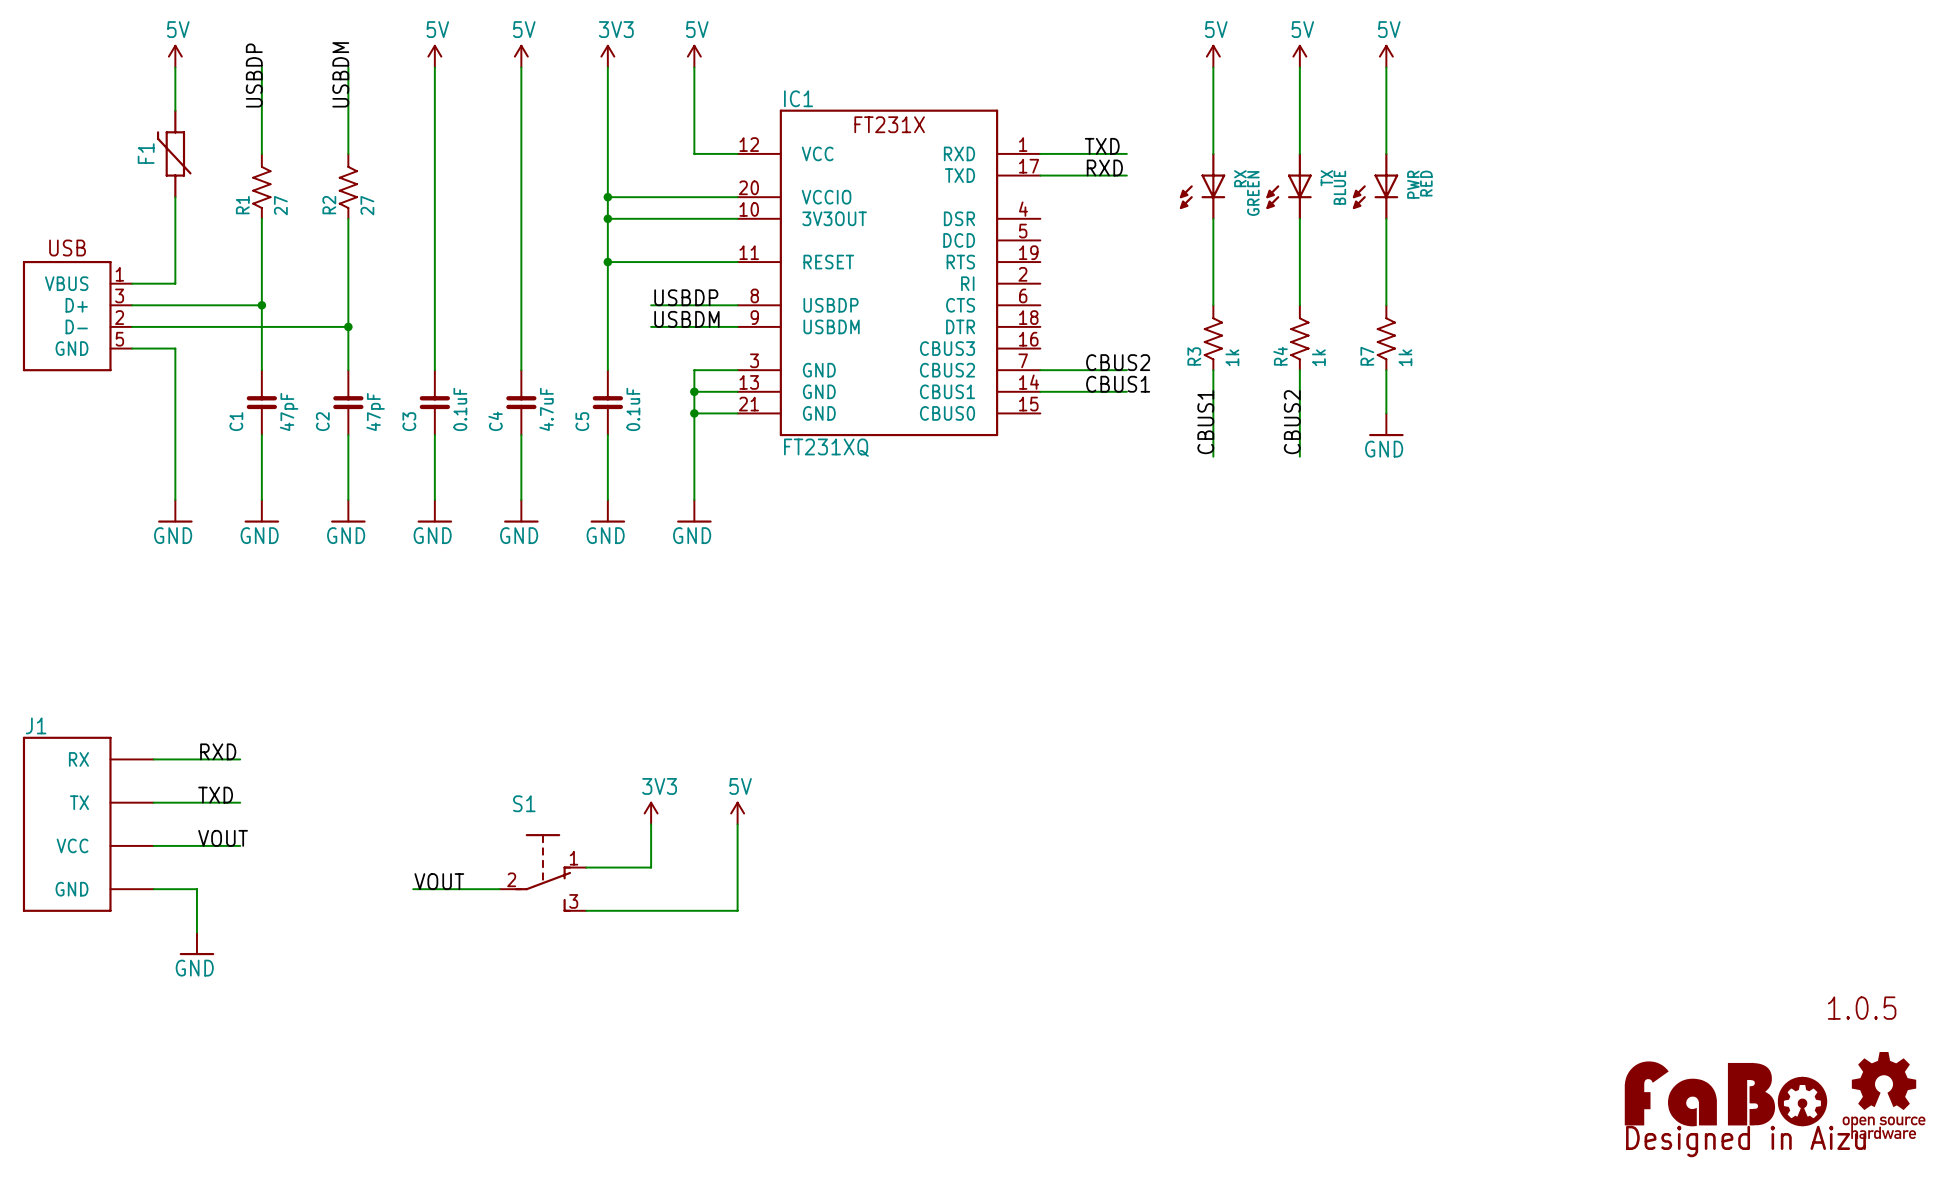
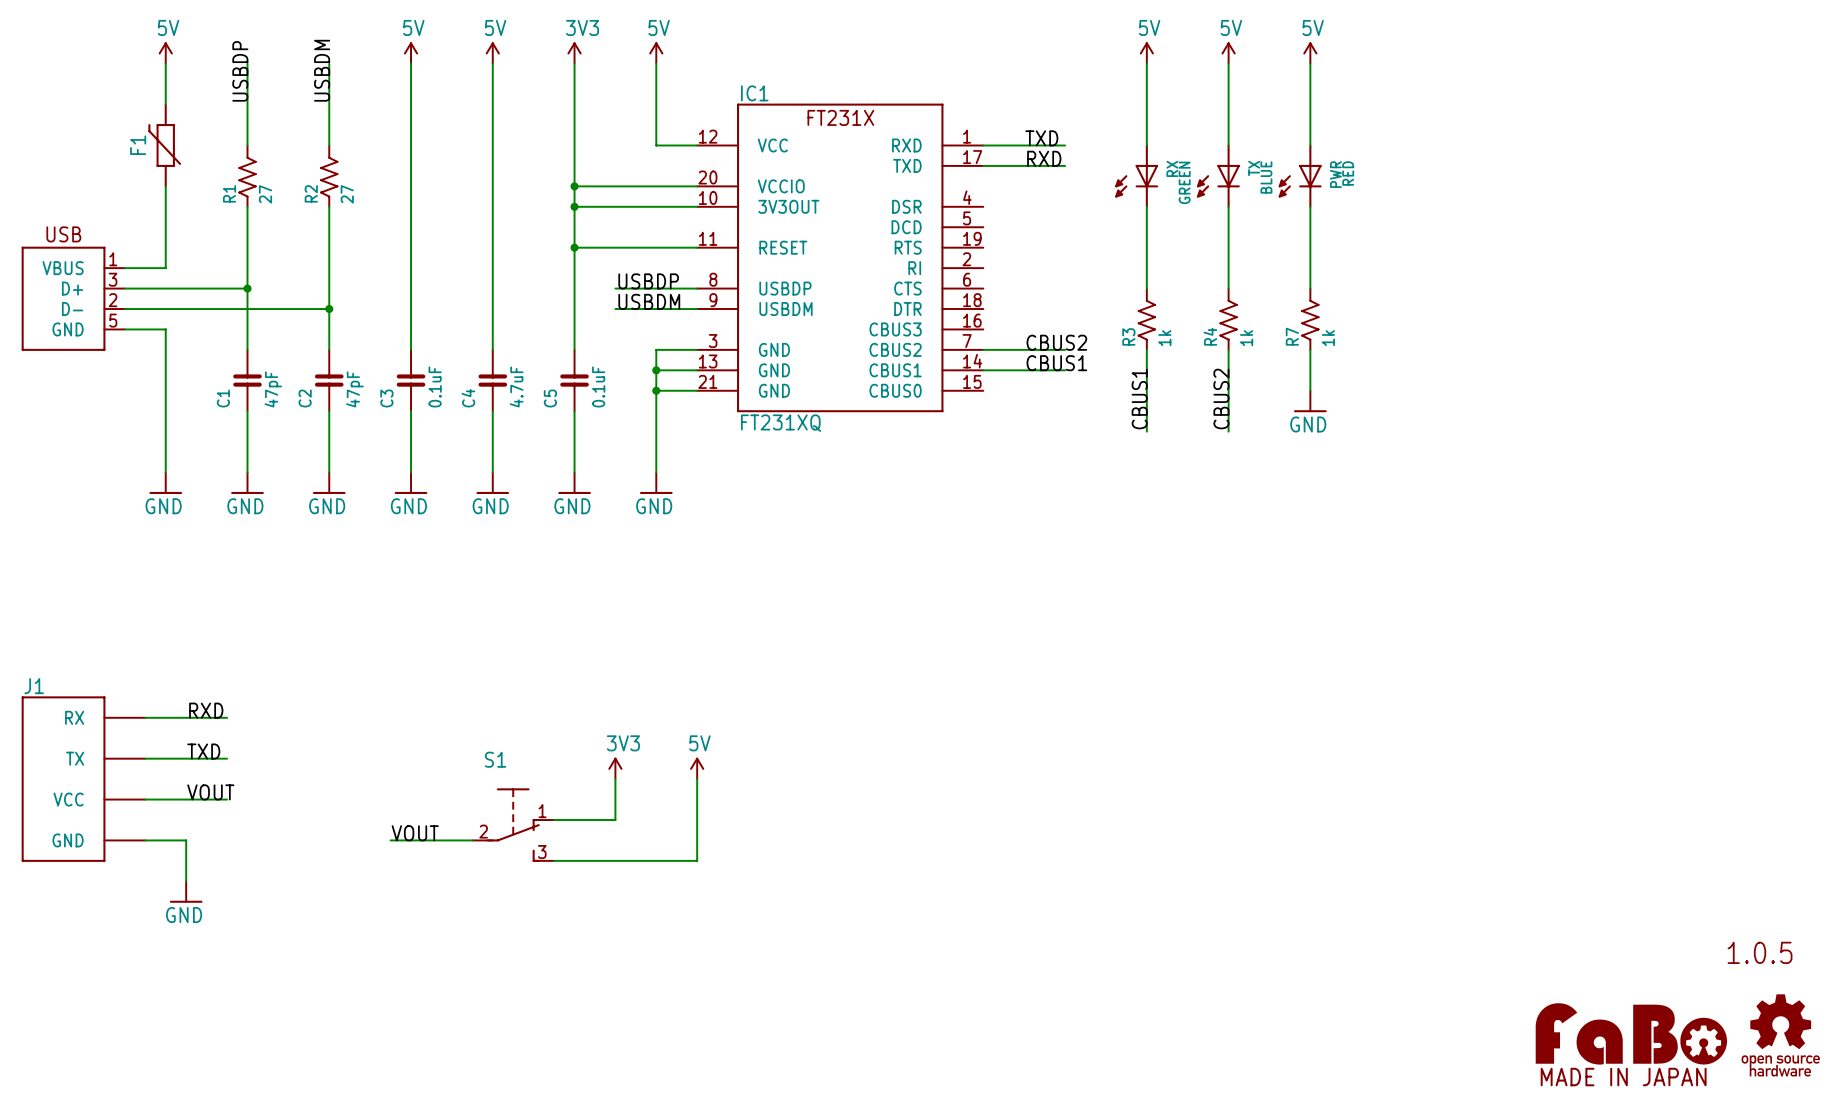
part text: none -> MADE IN JAPAN (1623, 1077)
part text: Designed in Aizu (1745, 1141) -> none

